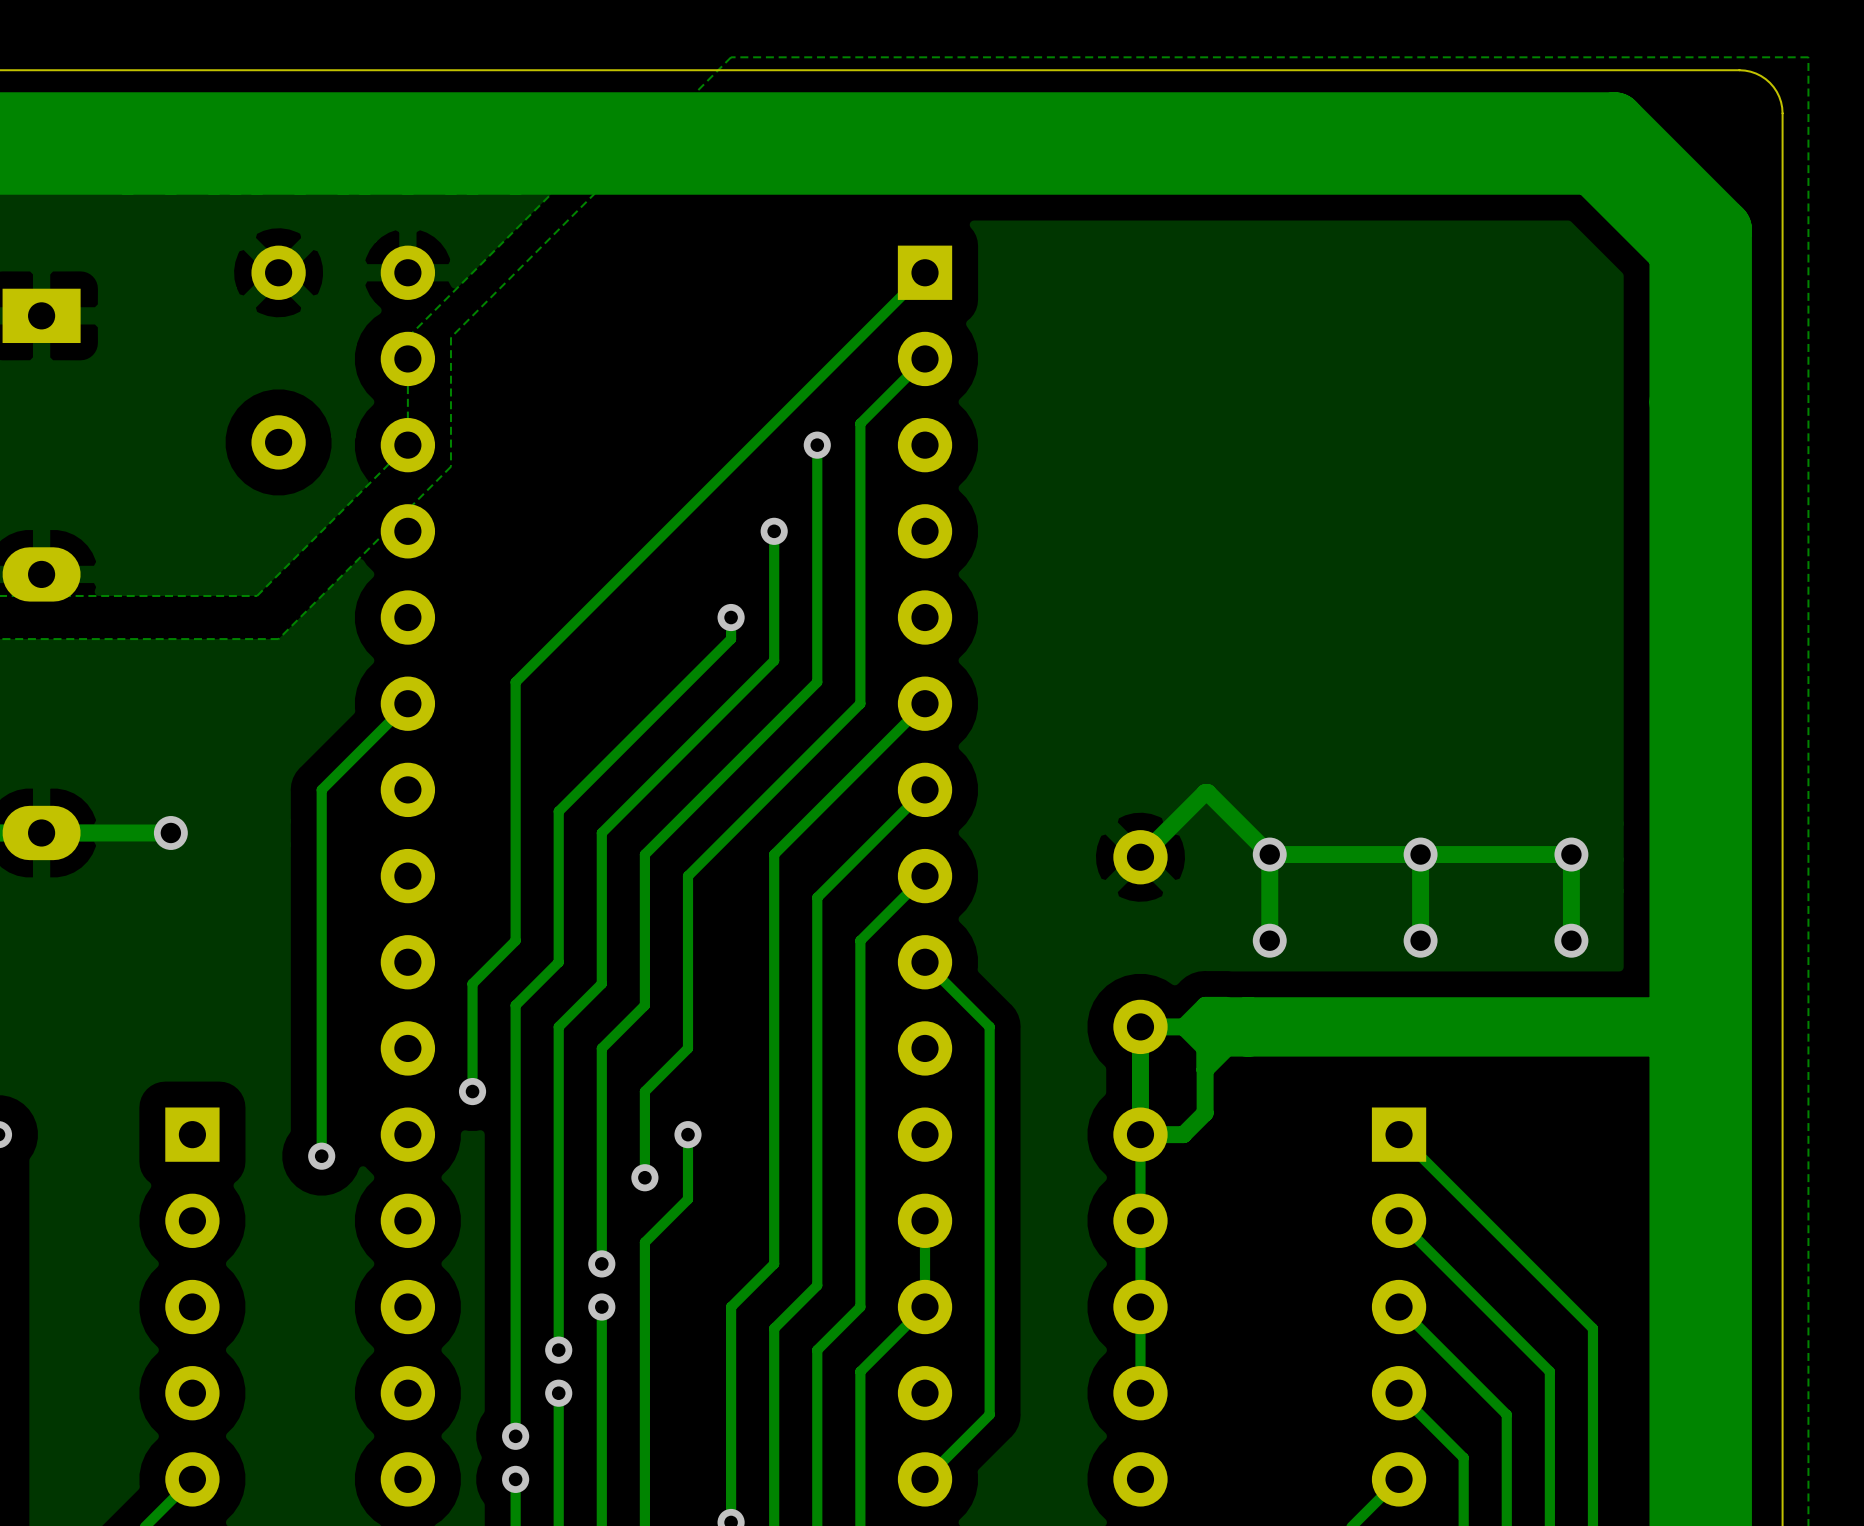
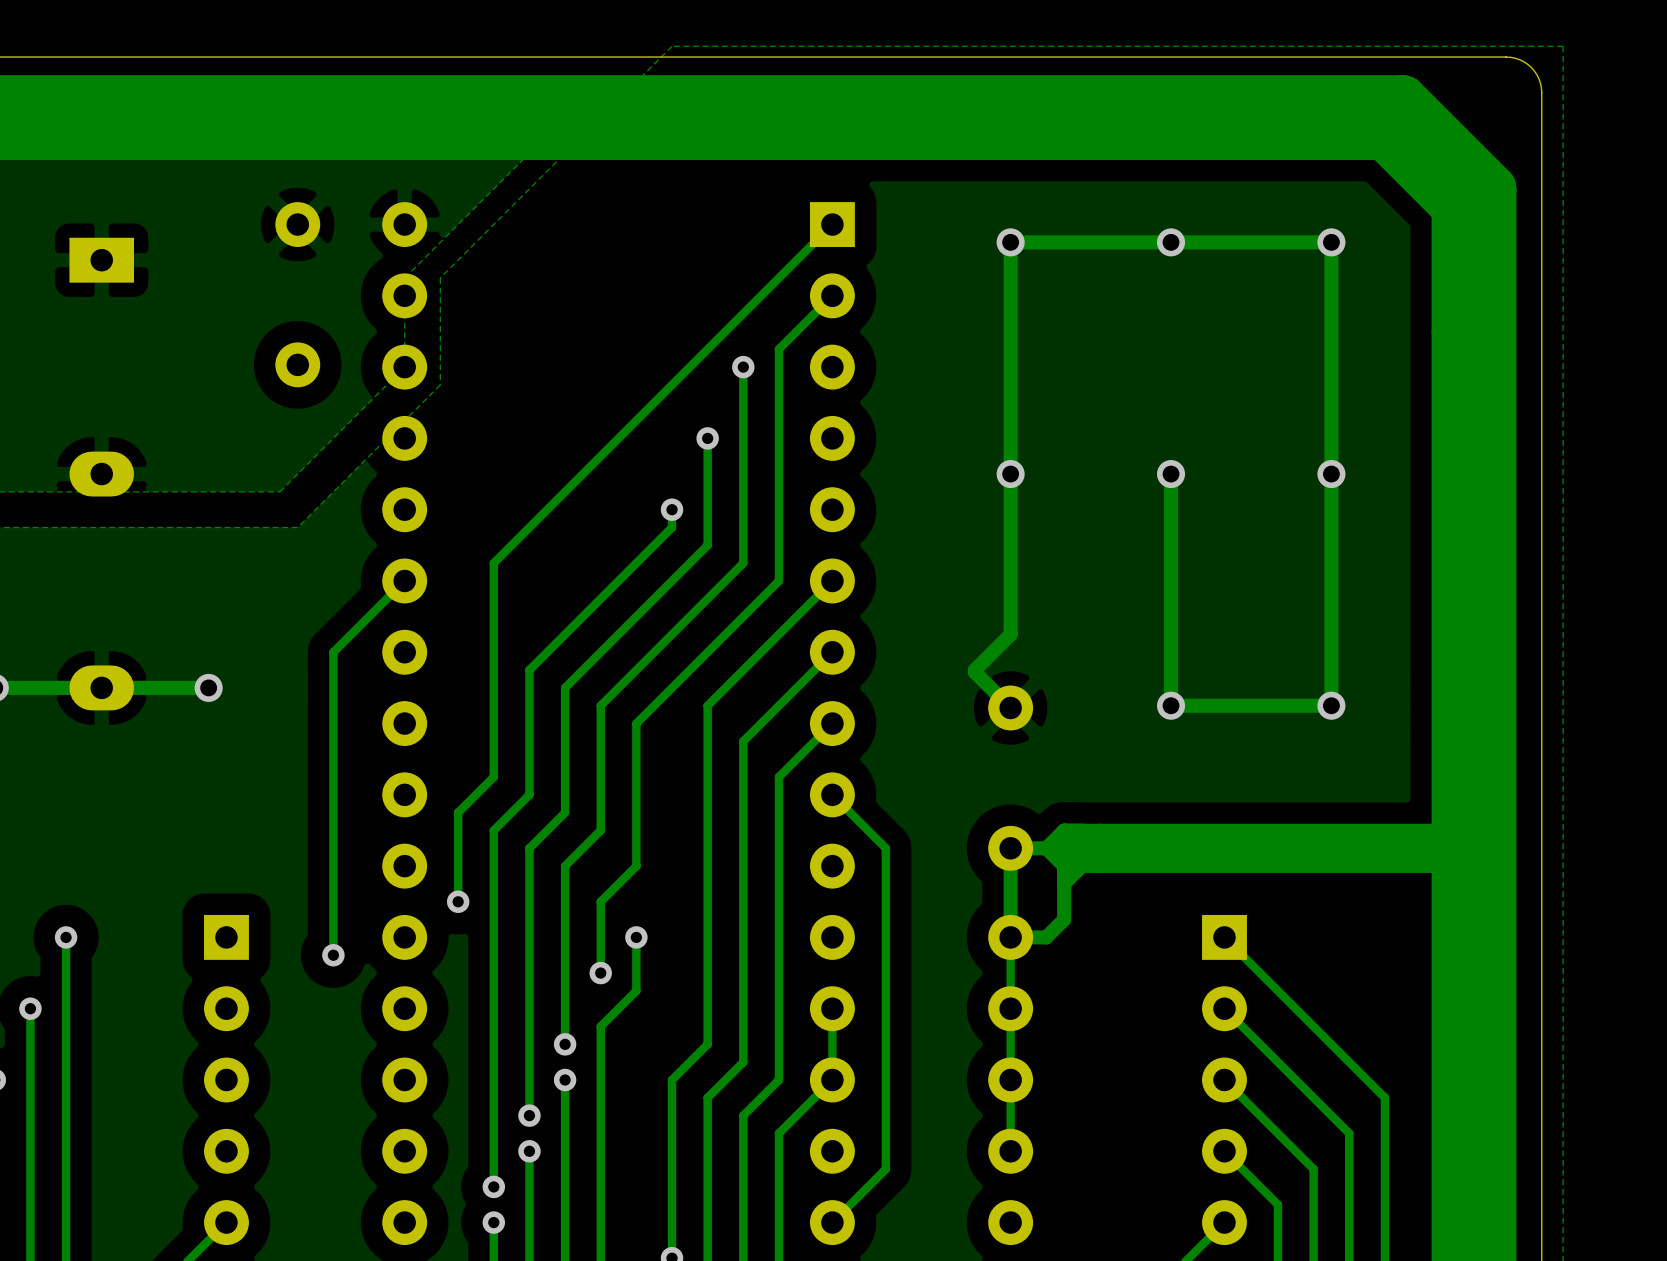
via: none -> (1010, 242)
via: none -> (1171, 242)
via: none -> (1331, 242)
via: none -> (1010, 474)
via: none -> (1171, 474)
via: none -> (1331, 474)
track: (1269, 854) (1207, 792) (1205, 792) (1140, 857) -> (1331, 705) (1331, 242) (1010, 242) (1010, 634) (974, 670) (974, 672) (1010, 707)
track: (1269, 854) (1269, 940) -> none
via: (1269, 854) -> none
track: (1334, 854) (1269, 854) -> (1171, 705) (1171, 474)
via: none -> (1171, 705)
track: (1420, 854) (1420, 940) -> none
via: (1420, 854) -> none
track: (1528, 854) (1571, 854) (1571, 940) -> none
via position: (1571, 854) -> (1331, 705)
via: (1269, 940) -> none
via: (1420, 940) -> none
via: (1571, 940) -> none

